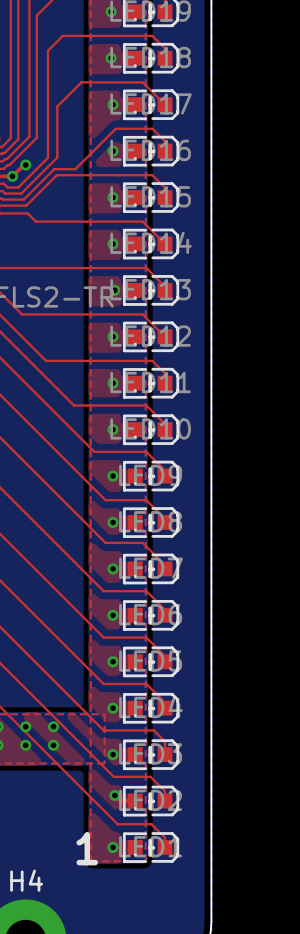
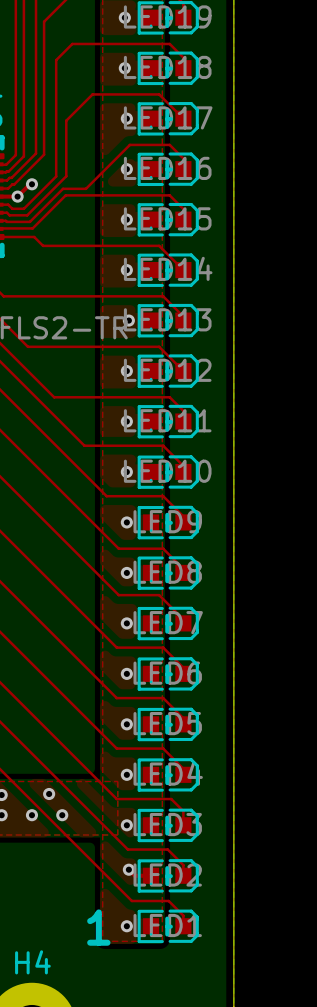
via: none -> (49, 794)
via: (25, 726) -> none
via: (53, 726) -> none

